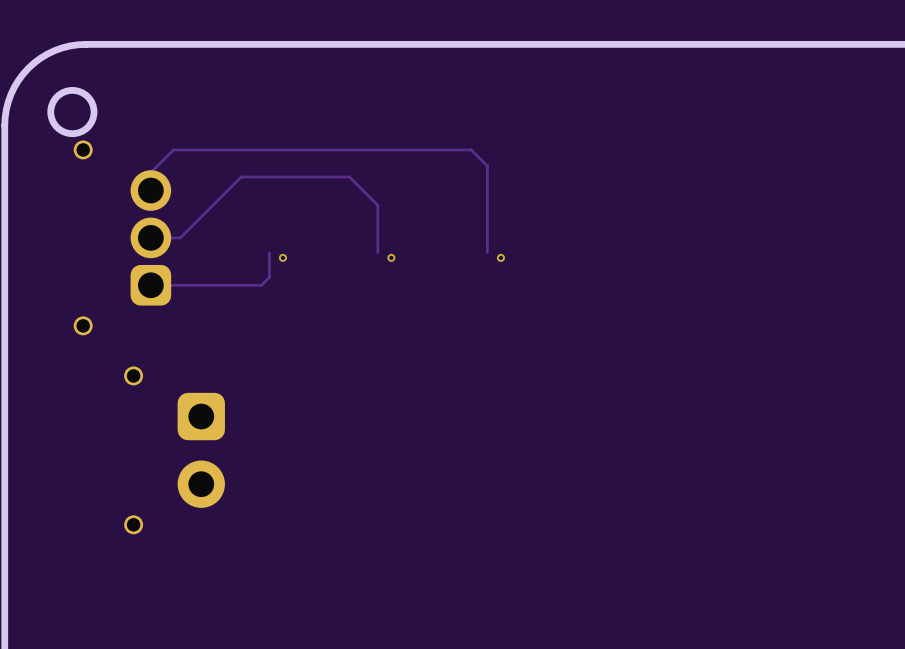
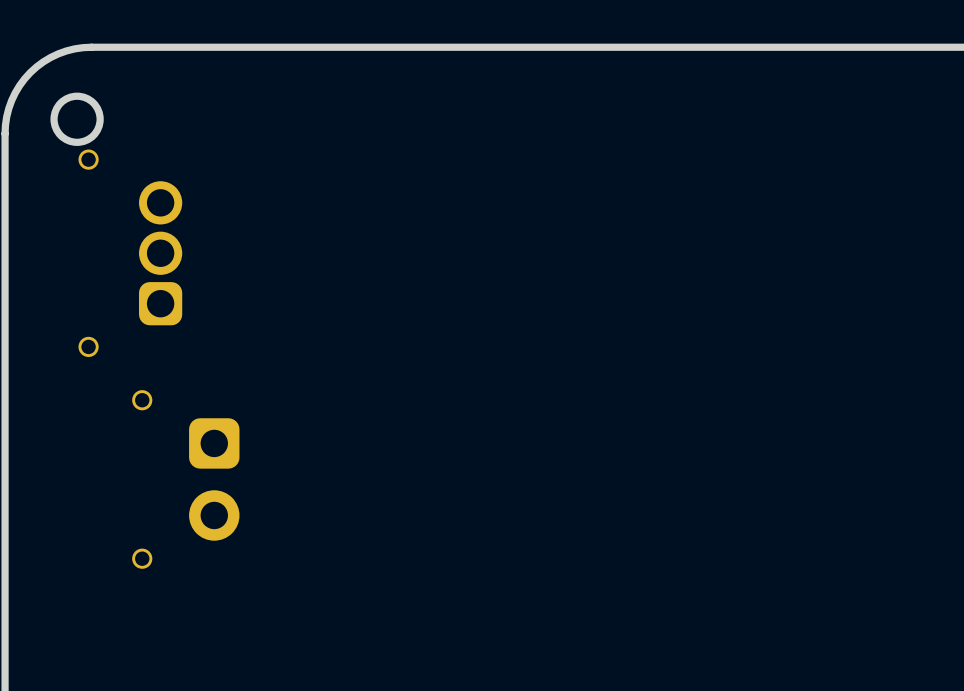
track: (150, 190) (150, 172) (173, 149) (471, 149) (487, 166) (487, 252) -> none
track: (150, 237) (180, 237) (241, 177) (349, 177) (377, 205) (377, 252) -> none
track: (269, 252) (269, 277) (261, 285) (150, 285) -> none
via: (282, 257) -> none
via: (391, 257) -> none
via: (500, 257) -> none

